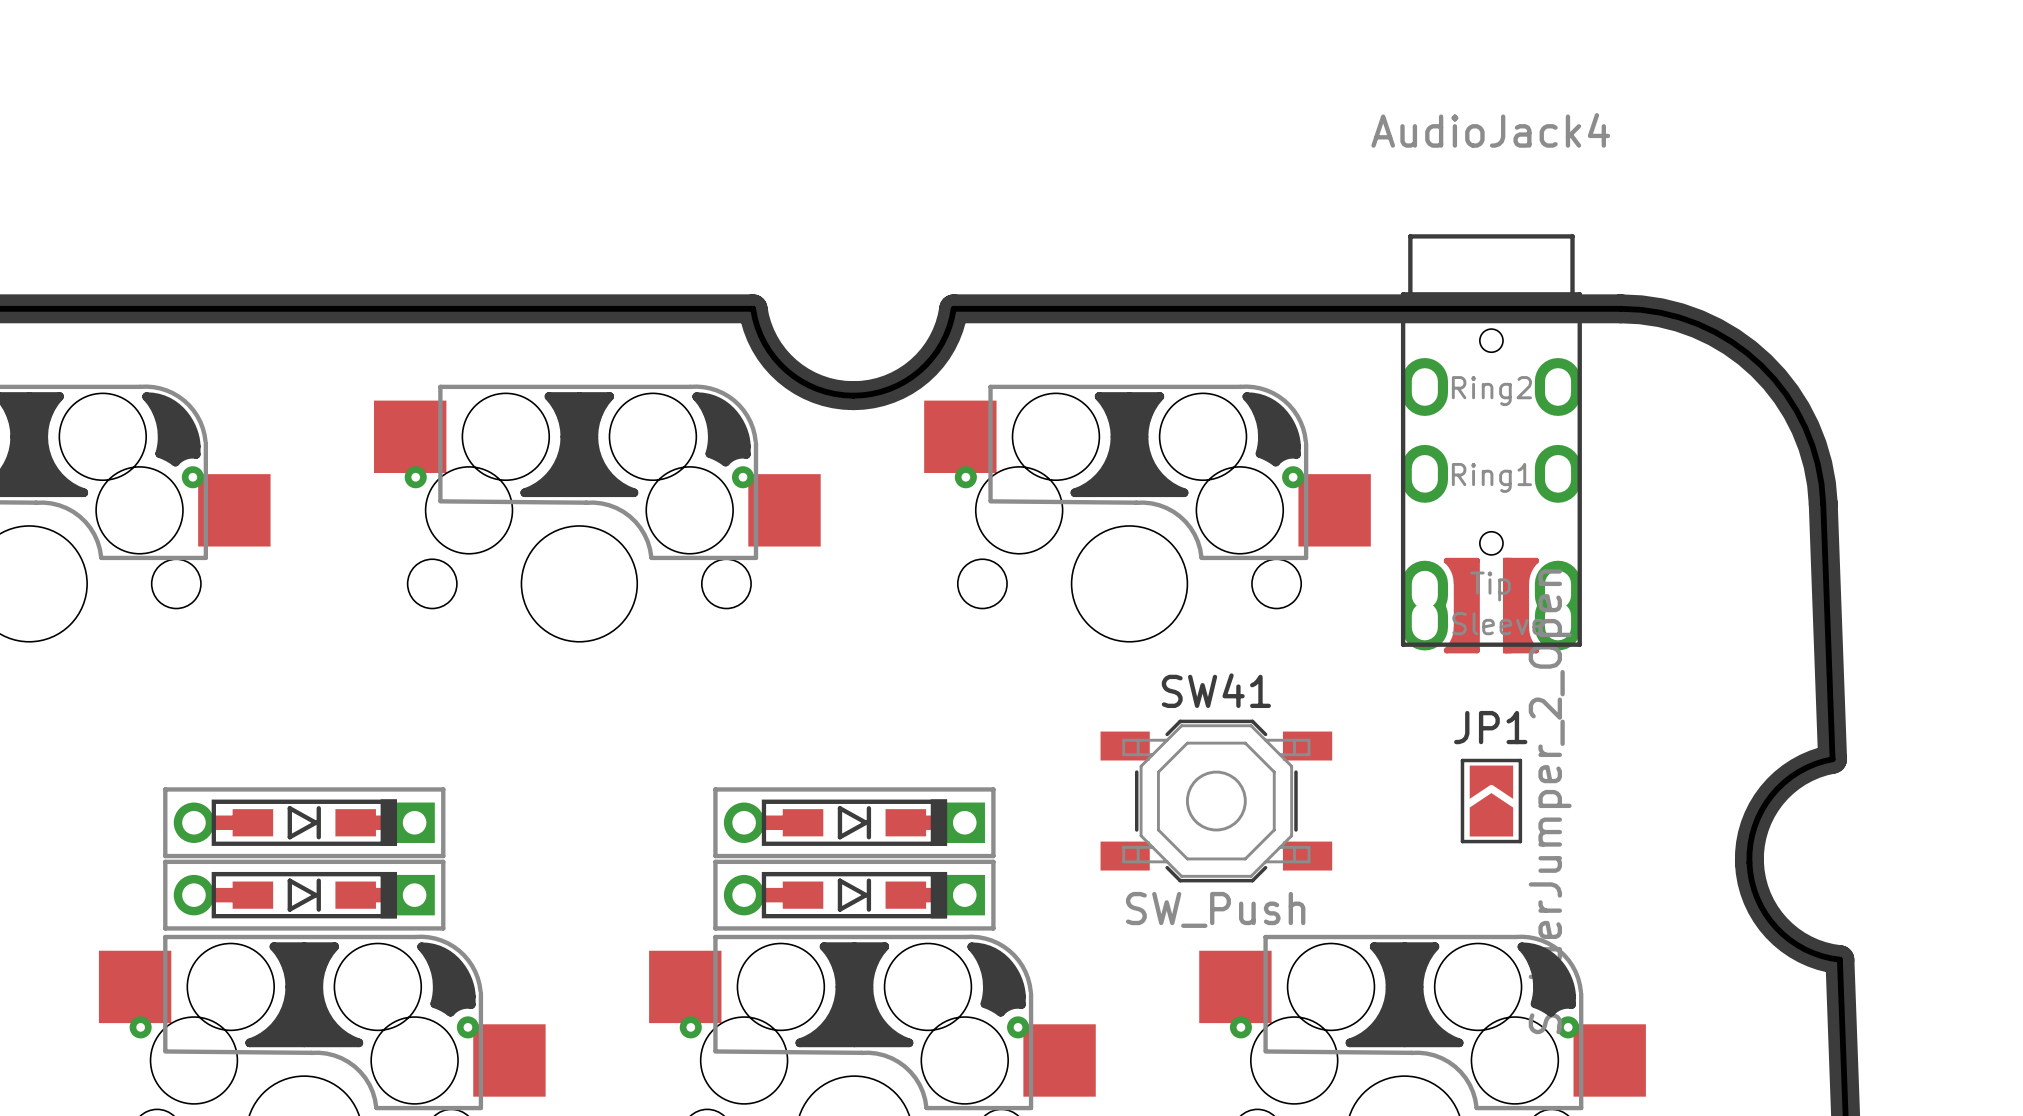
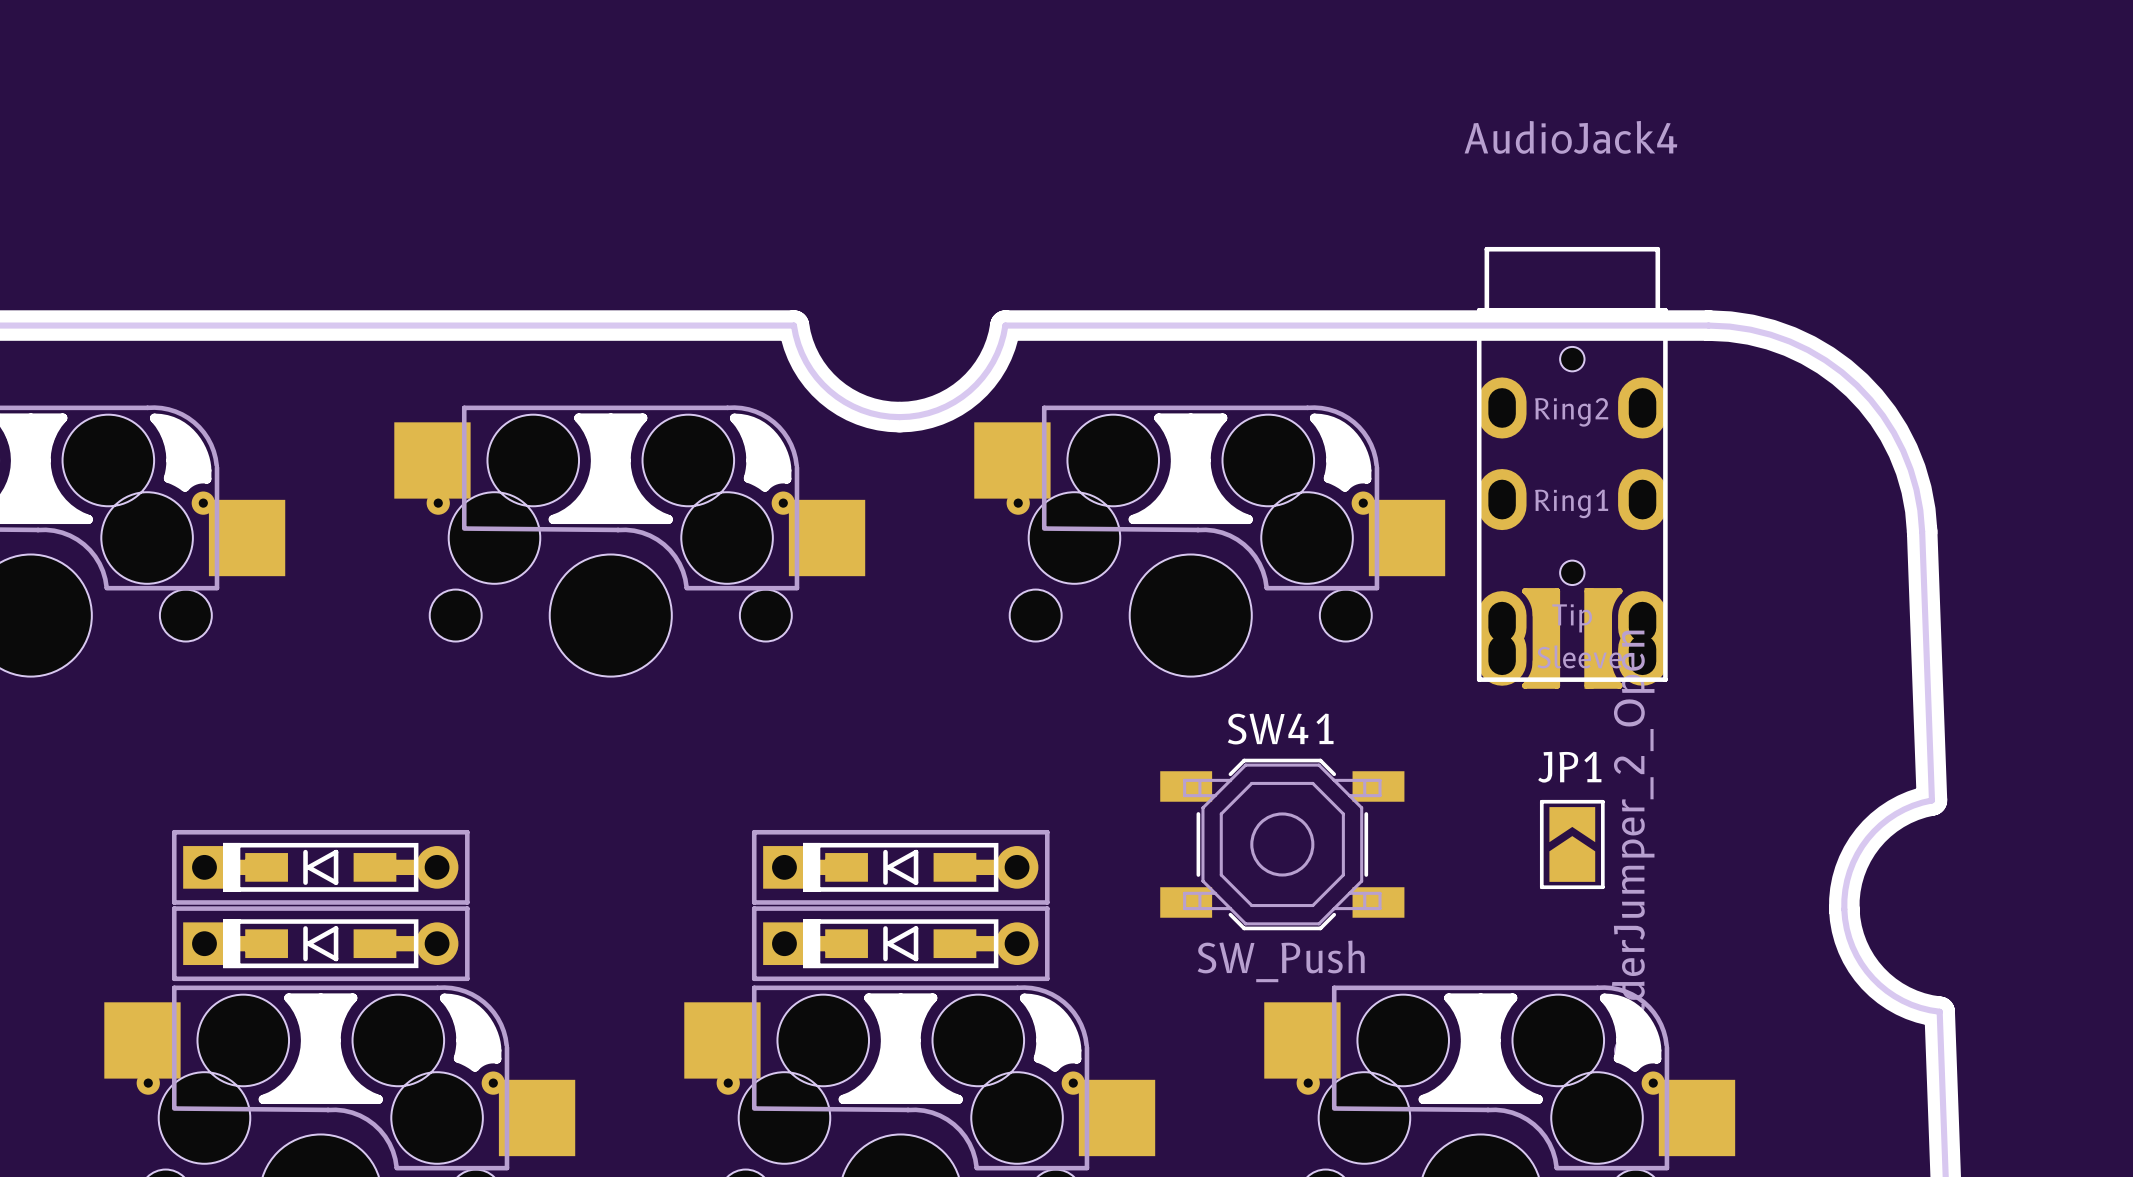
part rotation: 0° (304, 822) -> 180° (320, 867)
part rotation: 0° (854, 822) -> 180° (900, 867)
part rotation: 0° (304, 895) -> 180° (320, 943)
part rotation: 0° (854, 895) -> 180° (900, 943)

